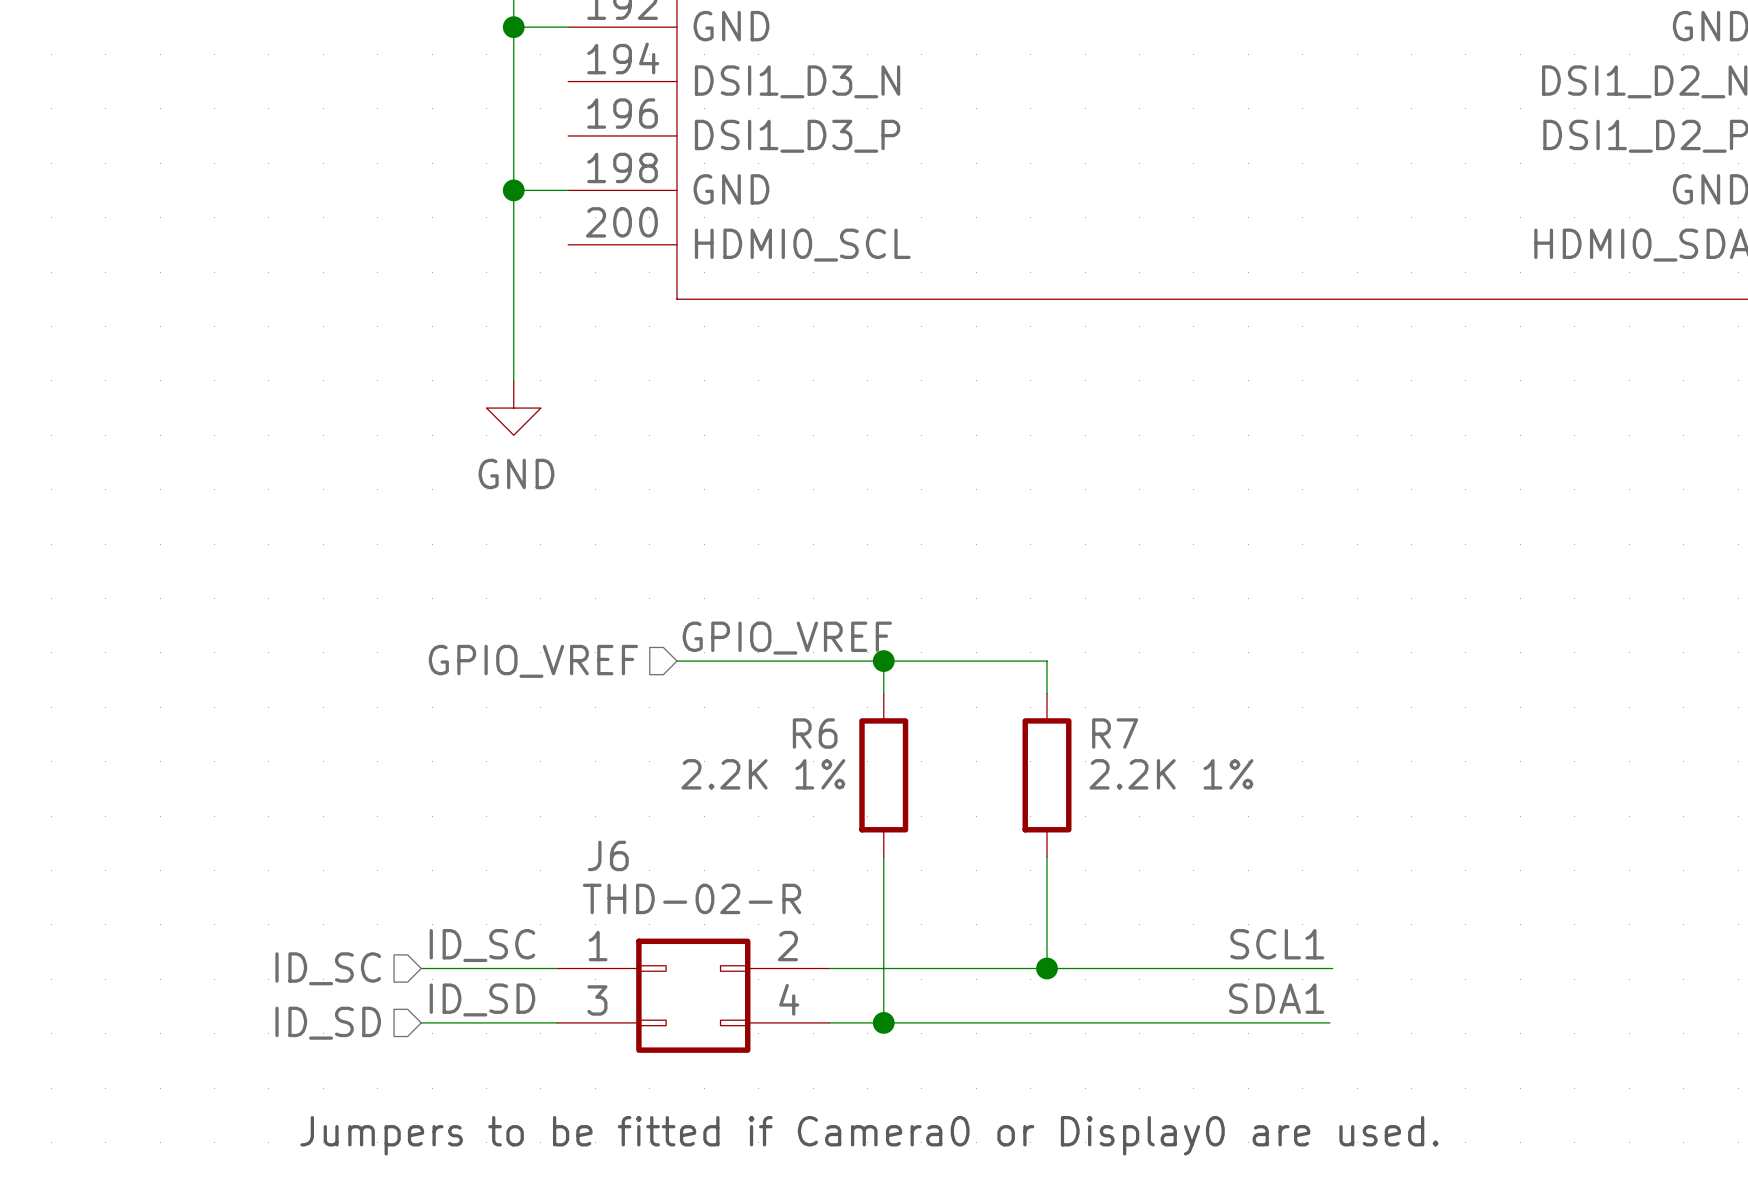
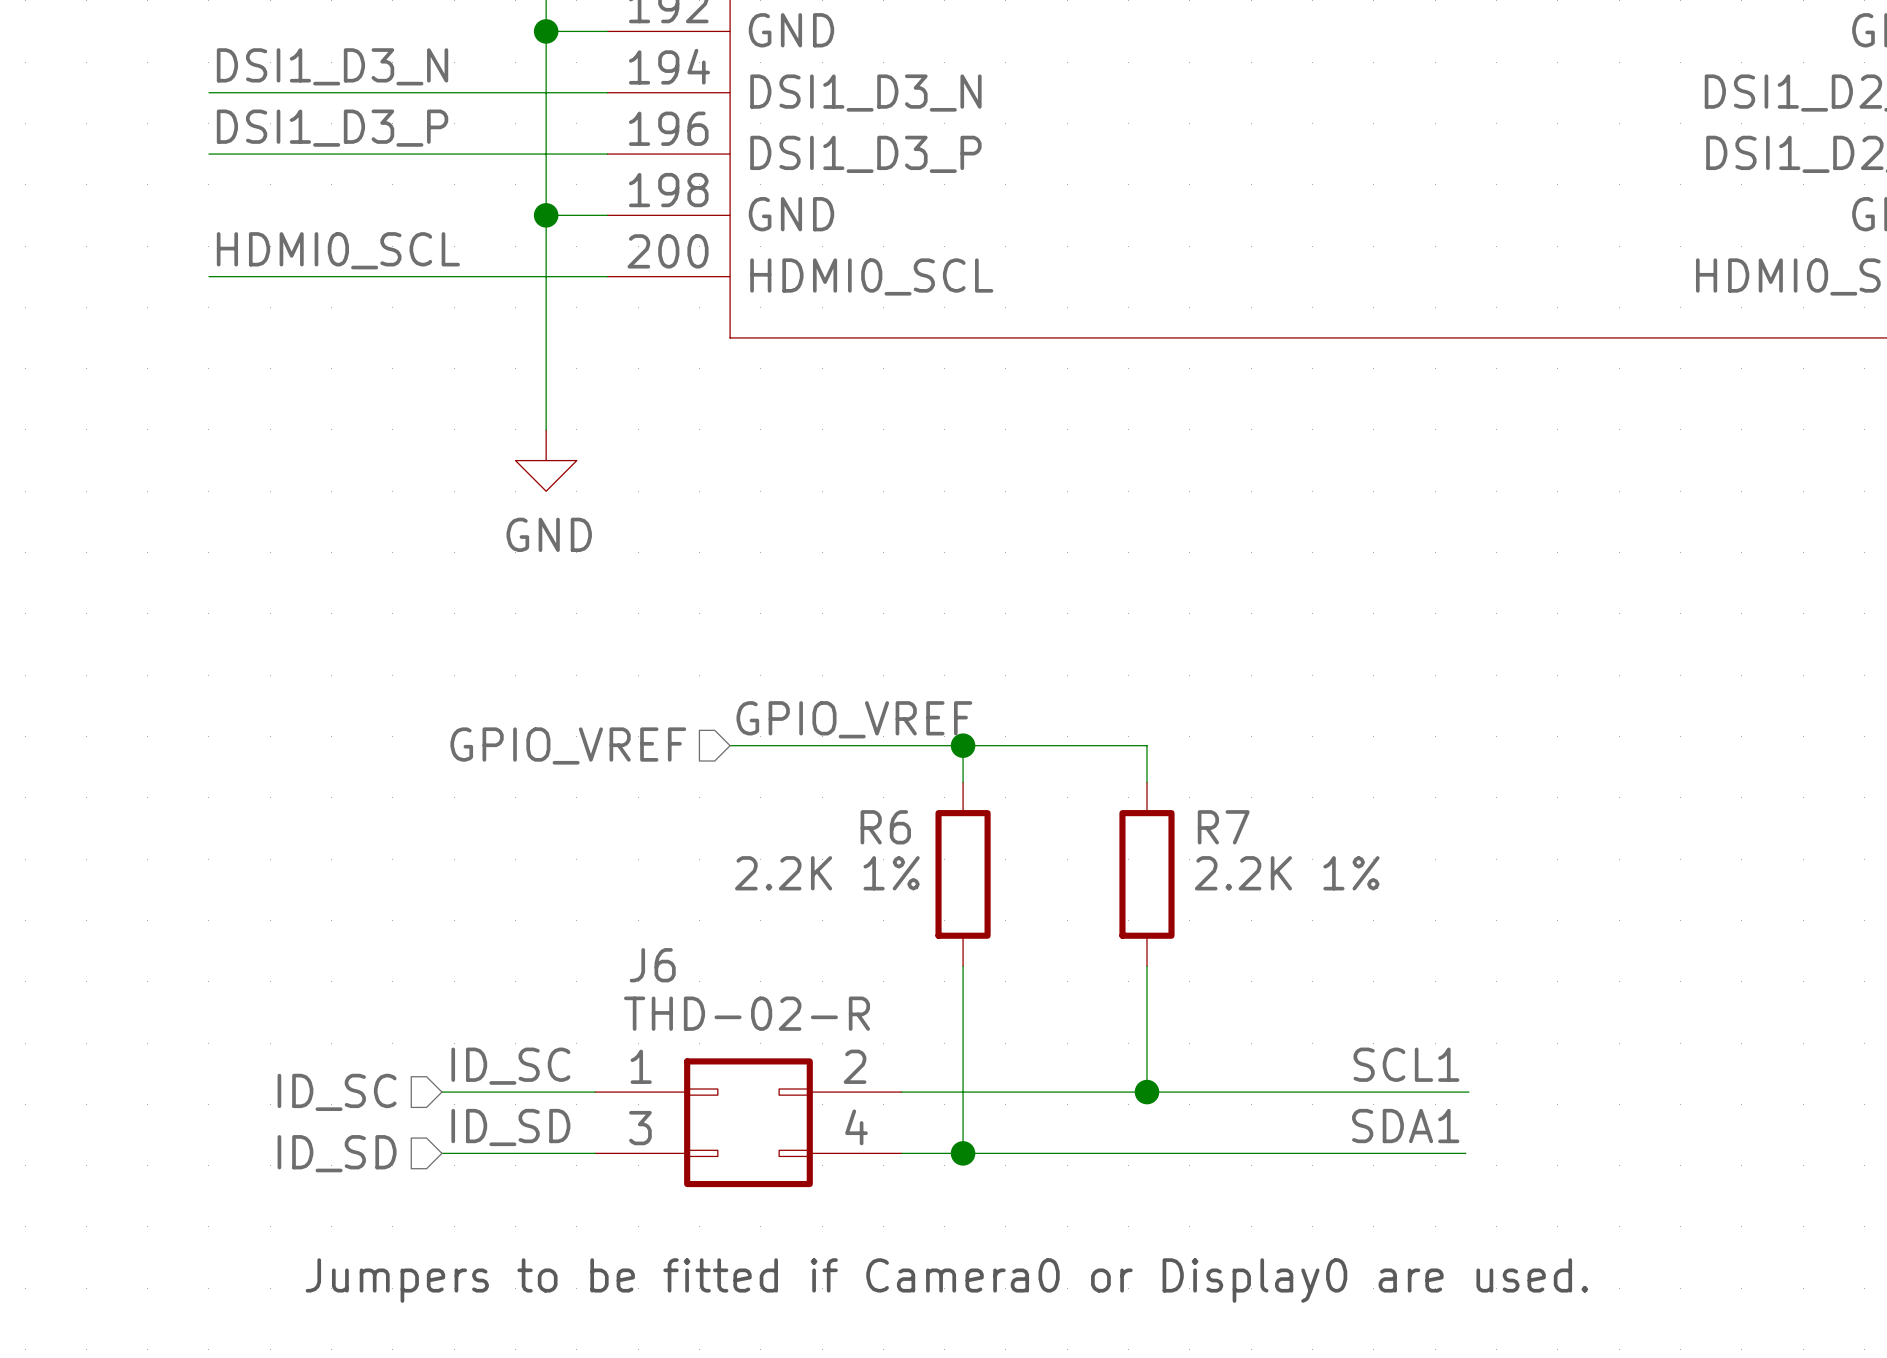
label: none -> DSI1_D3_N (332, 66)
wire: none -> (208, 92) (607, 92)
label: none -> DSI1_D3_P (332, 128)
wire: none -> (208, 154) (607, 154)
label: none -> HDMI0_SCL (338, 250)
wire: none -> (208, 276) (607, 276)

